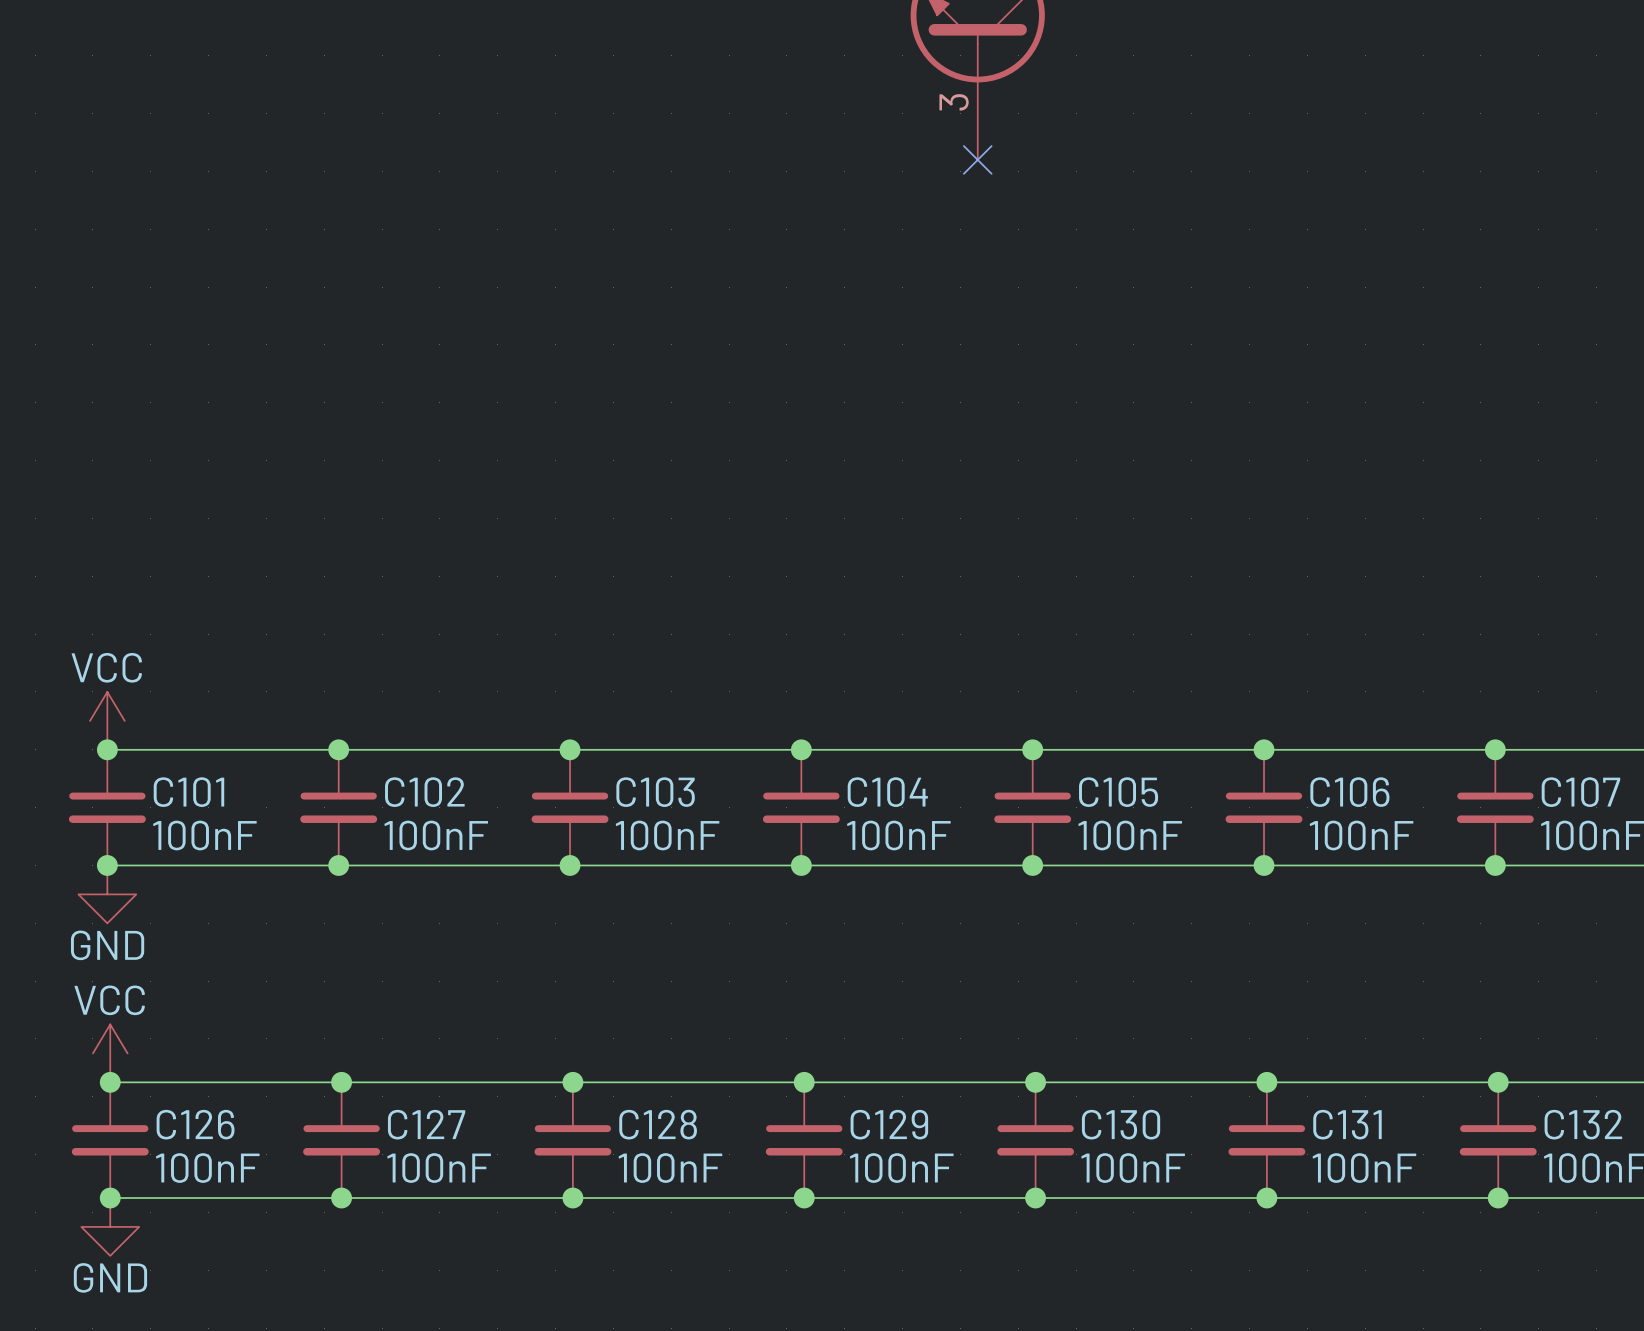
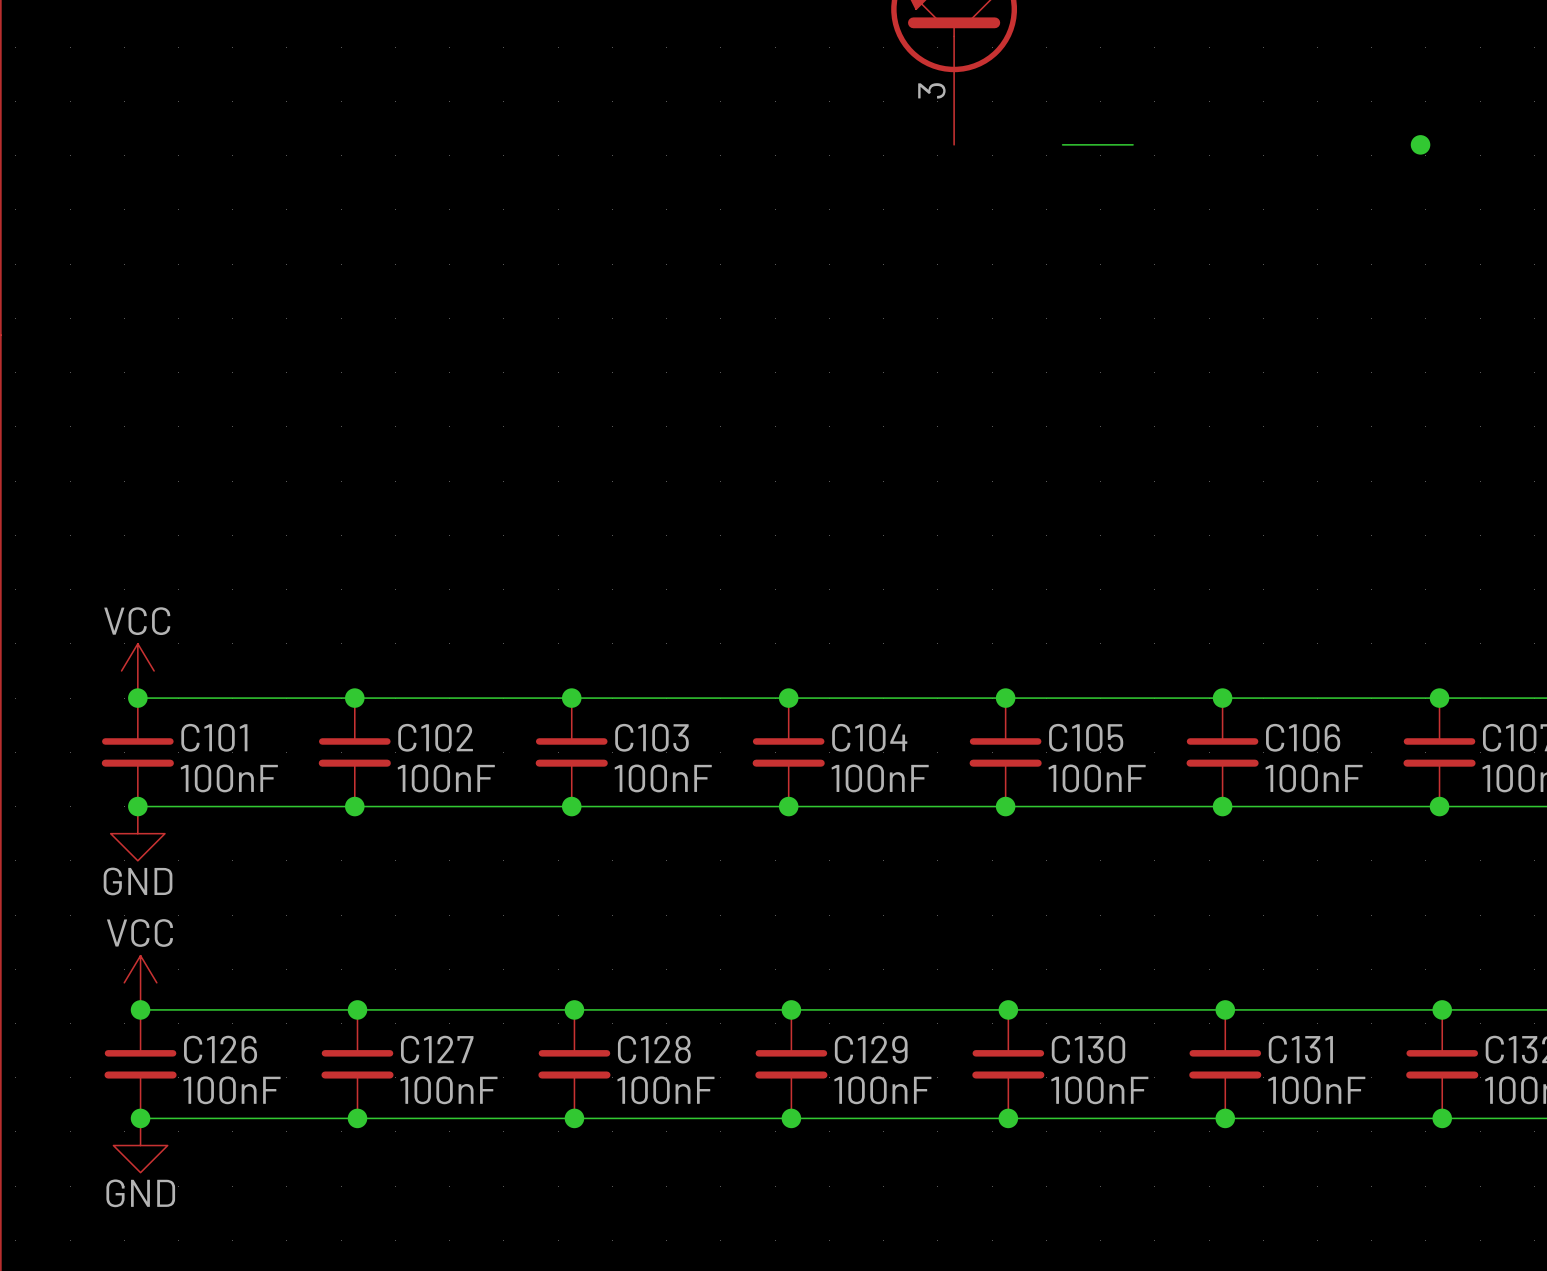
no-connect mark: (977, 159) -> none
wire: none -> (1062, 144) (1133, 144)
junction: none -> (1420, 144)

